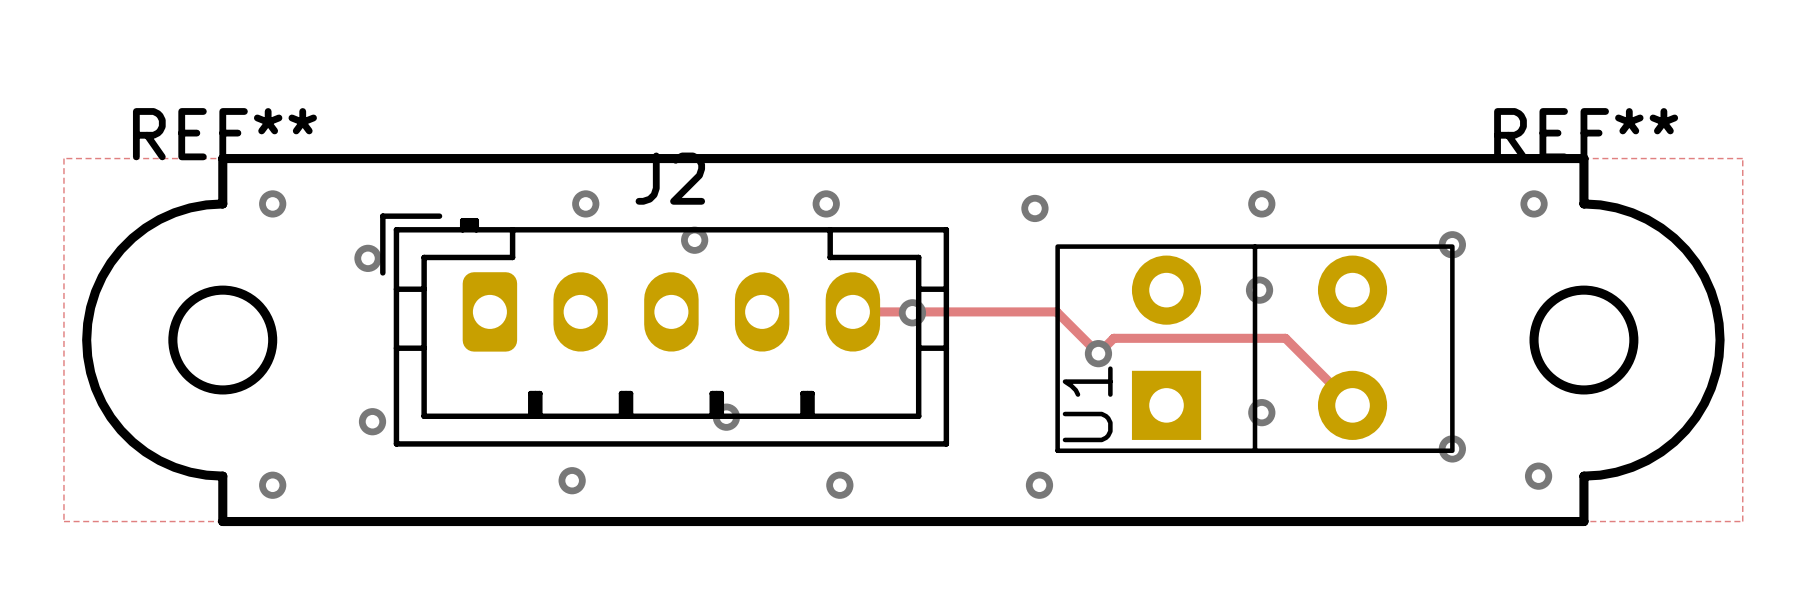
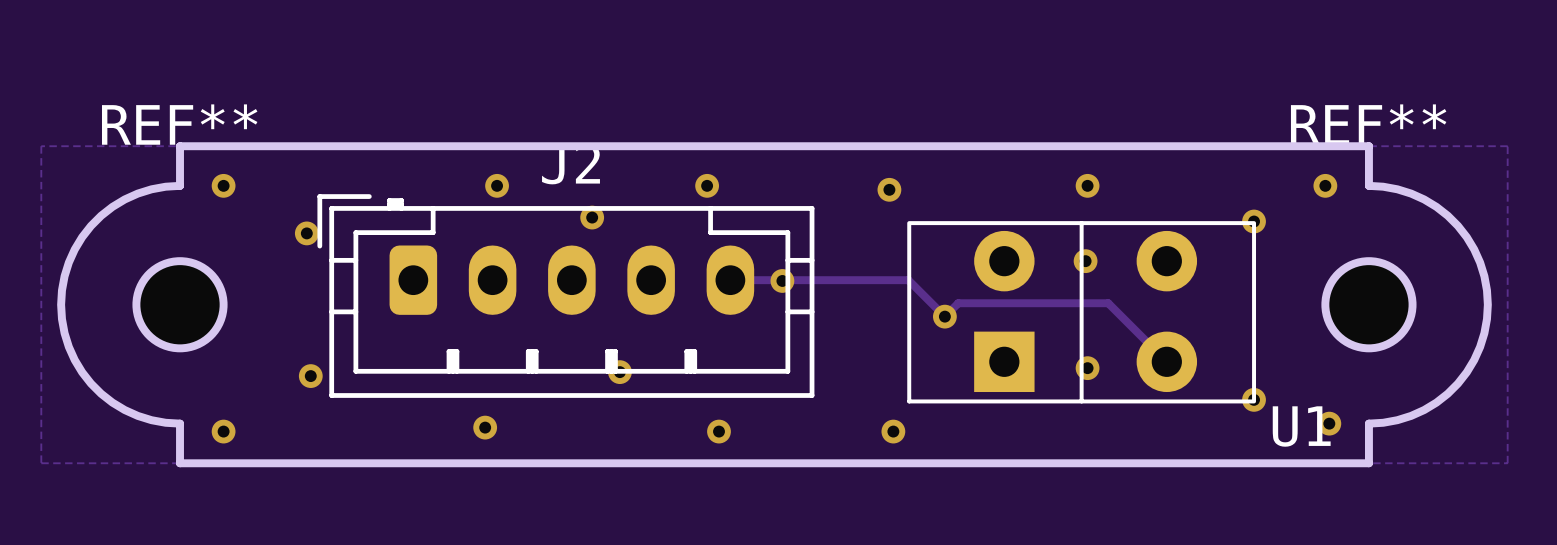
U1 name rotation: 0° (1087, 404) -> 90° clockwise (1301, 426)
U1 name position: U1 (1087, 404) -> U1 (1301, 426)

